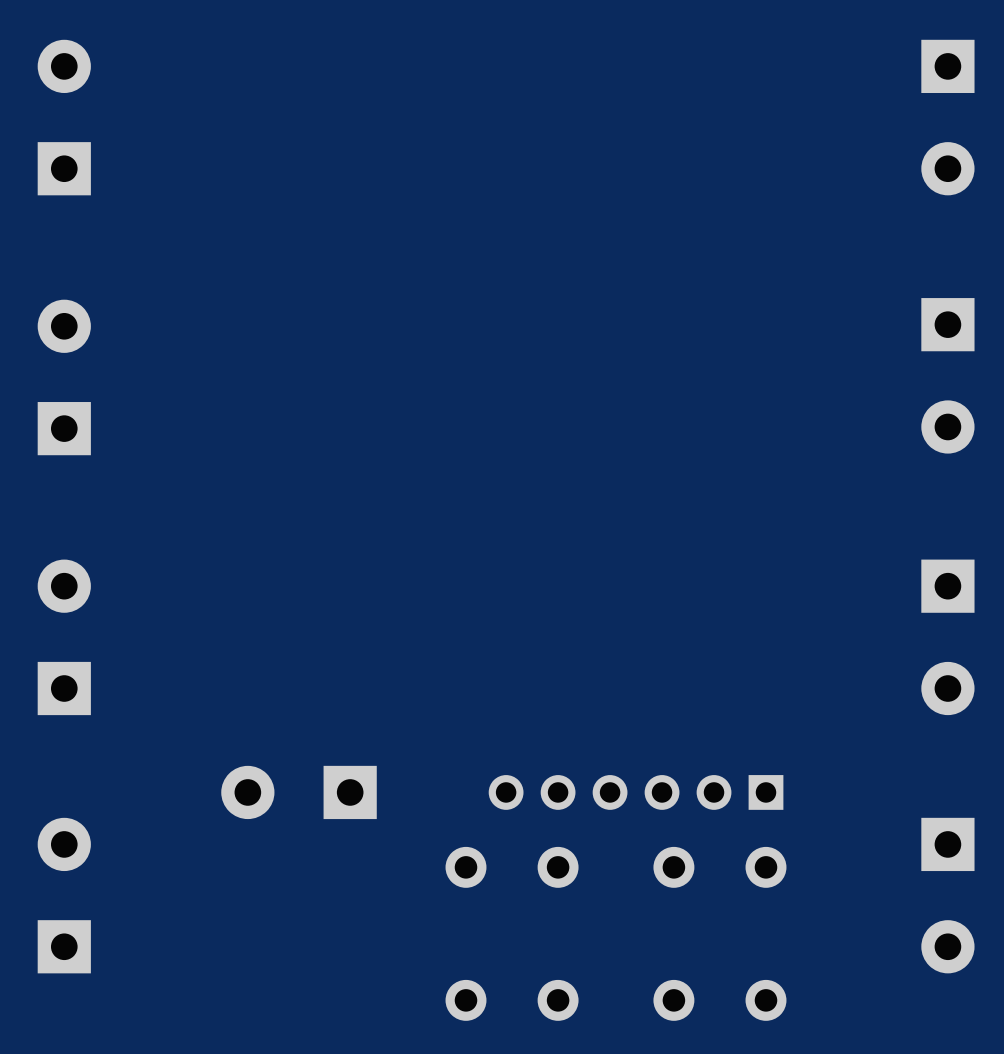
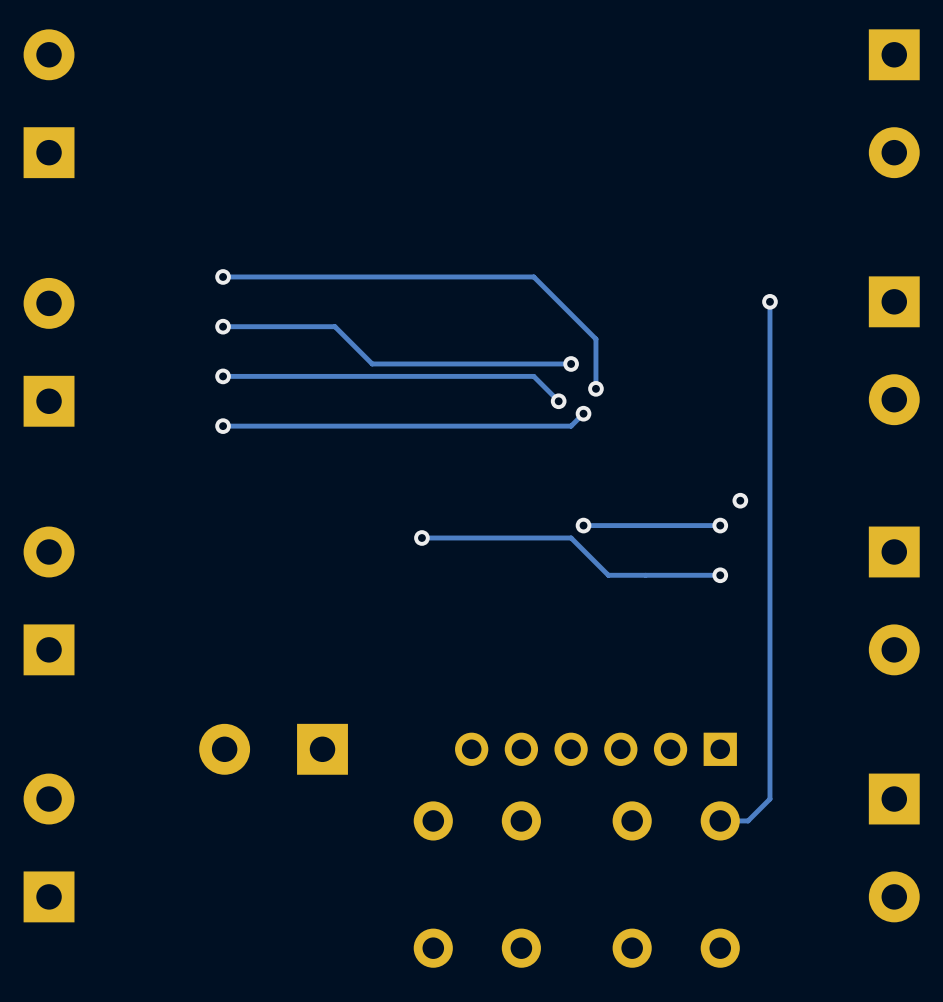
track: none -> (223, 276) (533, 276) (595, 339) (595, 388)
via: none -> (223, 276)
track: none -> (769, 301) (769, 799) (748, 820) (720, 820)
via: none -> (769, 301)
track: none -> (223, 326) (334, 326) (372, 363) (571, 363)
via: none -> (223, 326)
via: none -> (571, 363)
track: none -> (223, 376) (533, 376) (558, 401)
via: none -> (223, 376)
via: none -> (595, 388)
via: none -> (558, 401)
track: none -> (583, 413) (571, 426) (223, 426)
via: none -> (583, 413)
via: none -> (223, 426)
via: none -> (740, 500)
via: none -> (583, 525)
track: none -> (720, 525) (583, 525)
via: none -> (720, 525)
track: none -> (421, 537) (571, 537) (608, 575) (720, 575)
via: none -> (421, 537)
via: none -> (720, 575)

